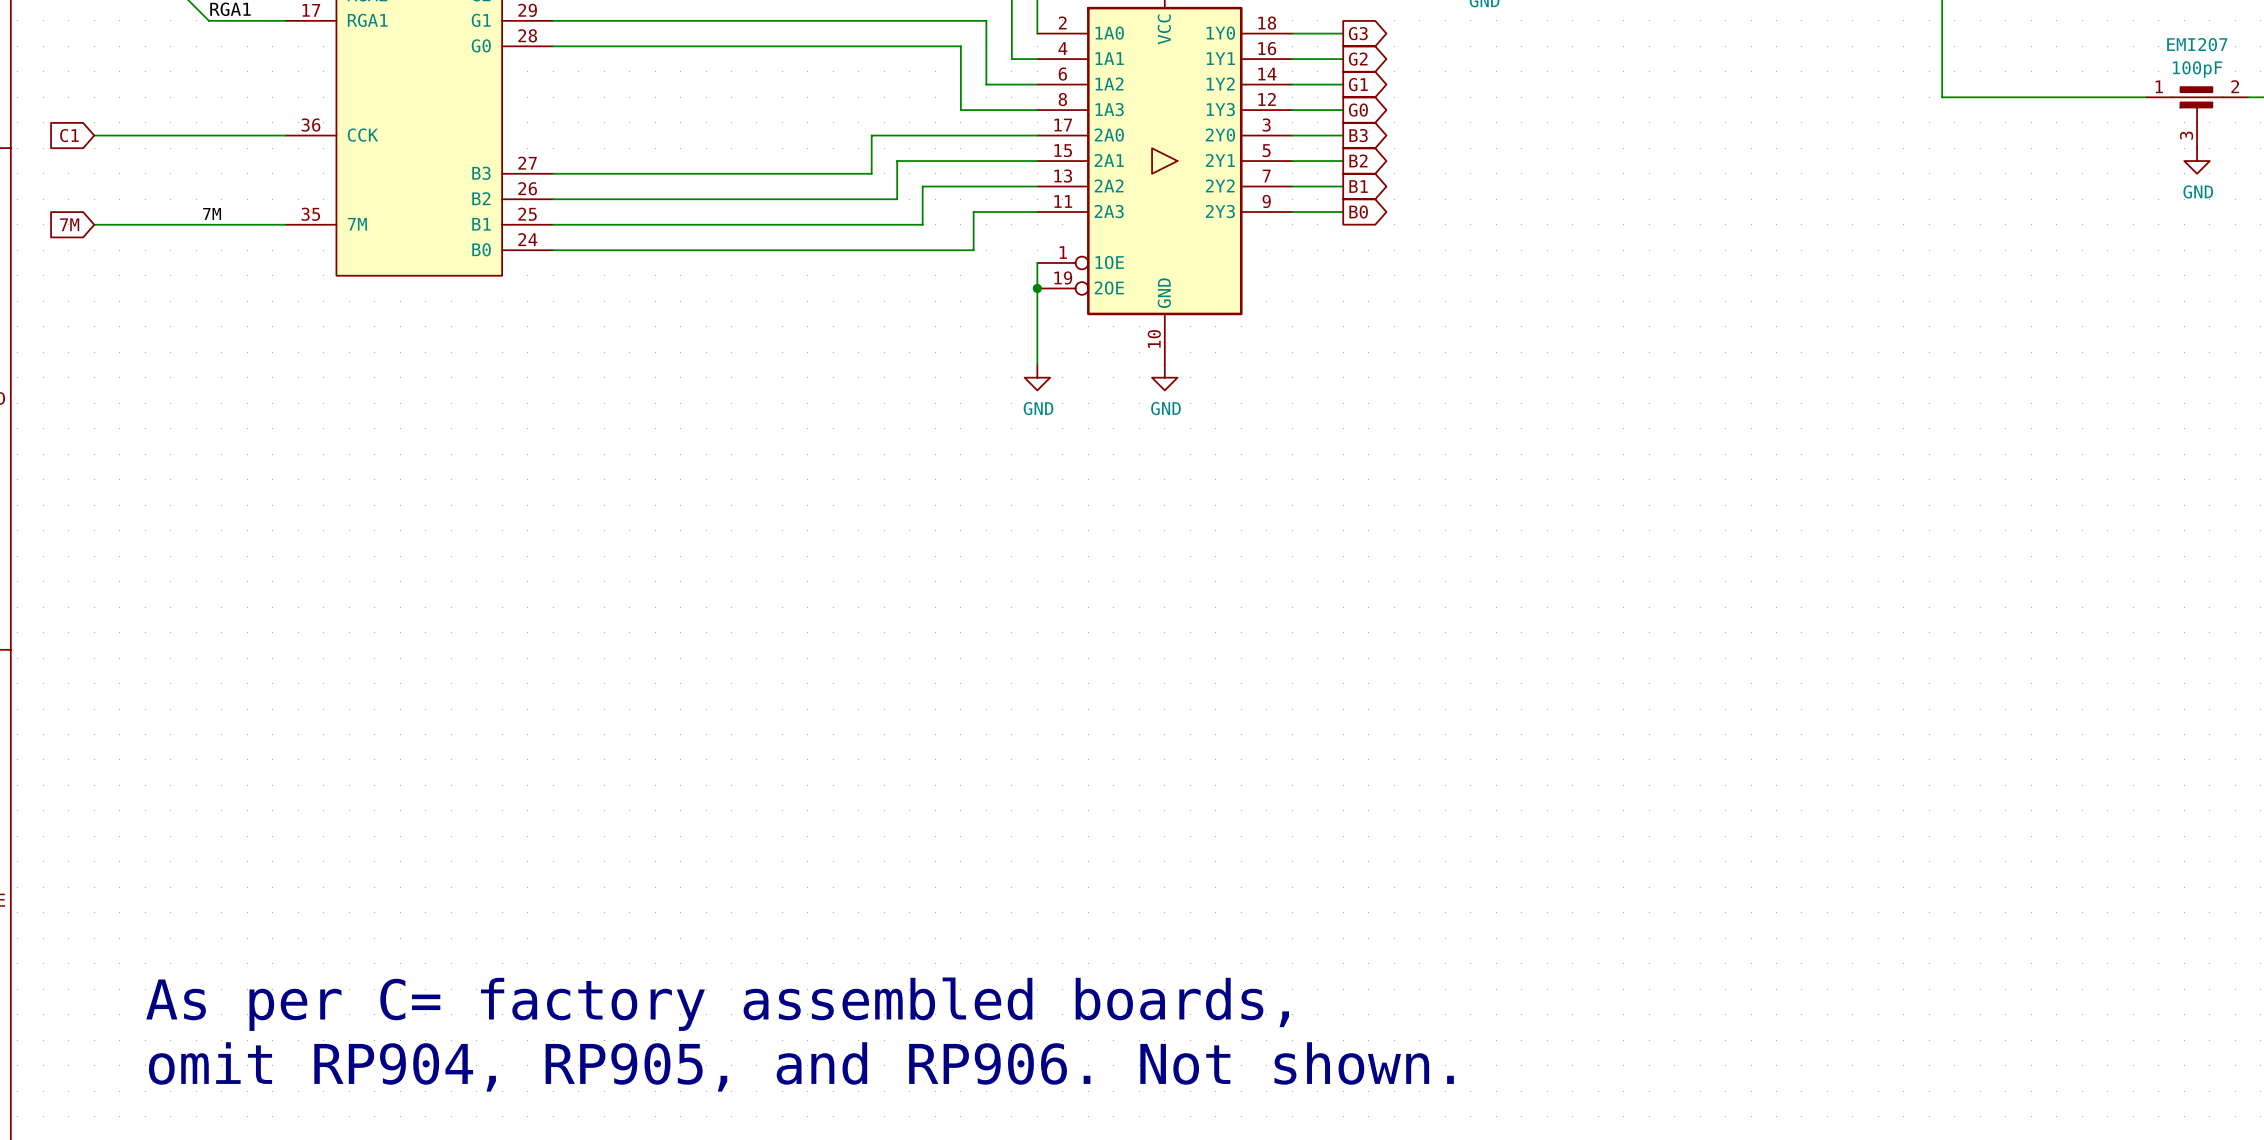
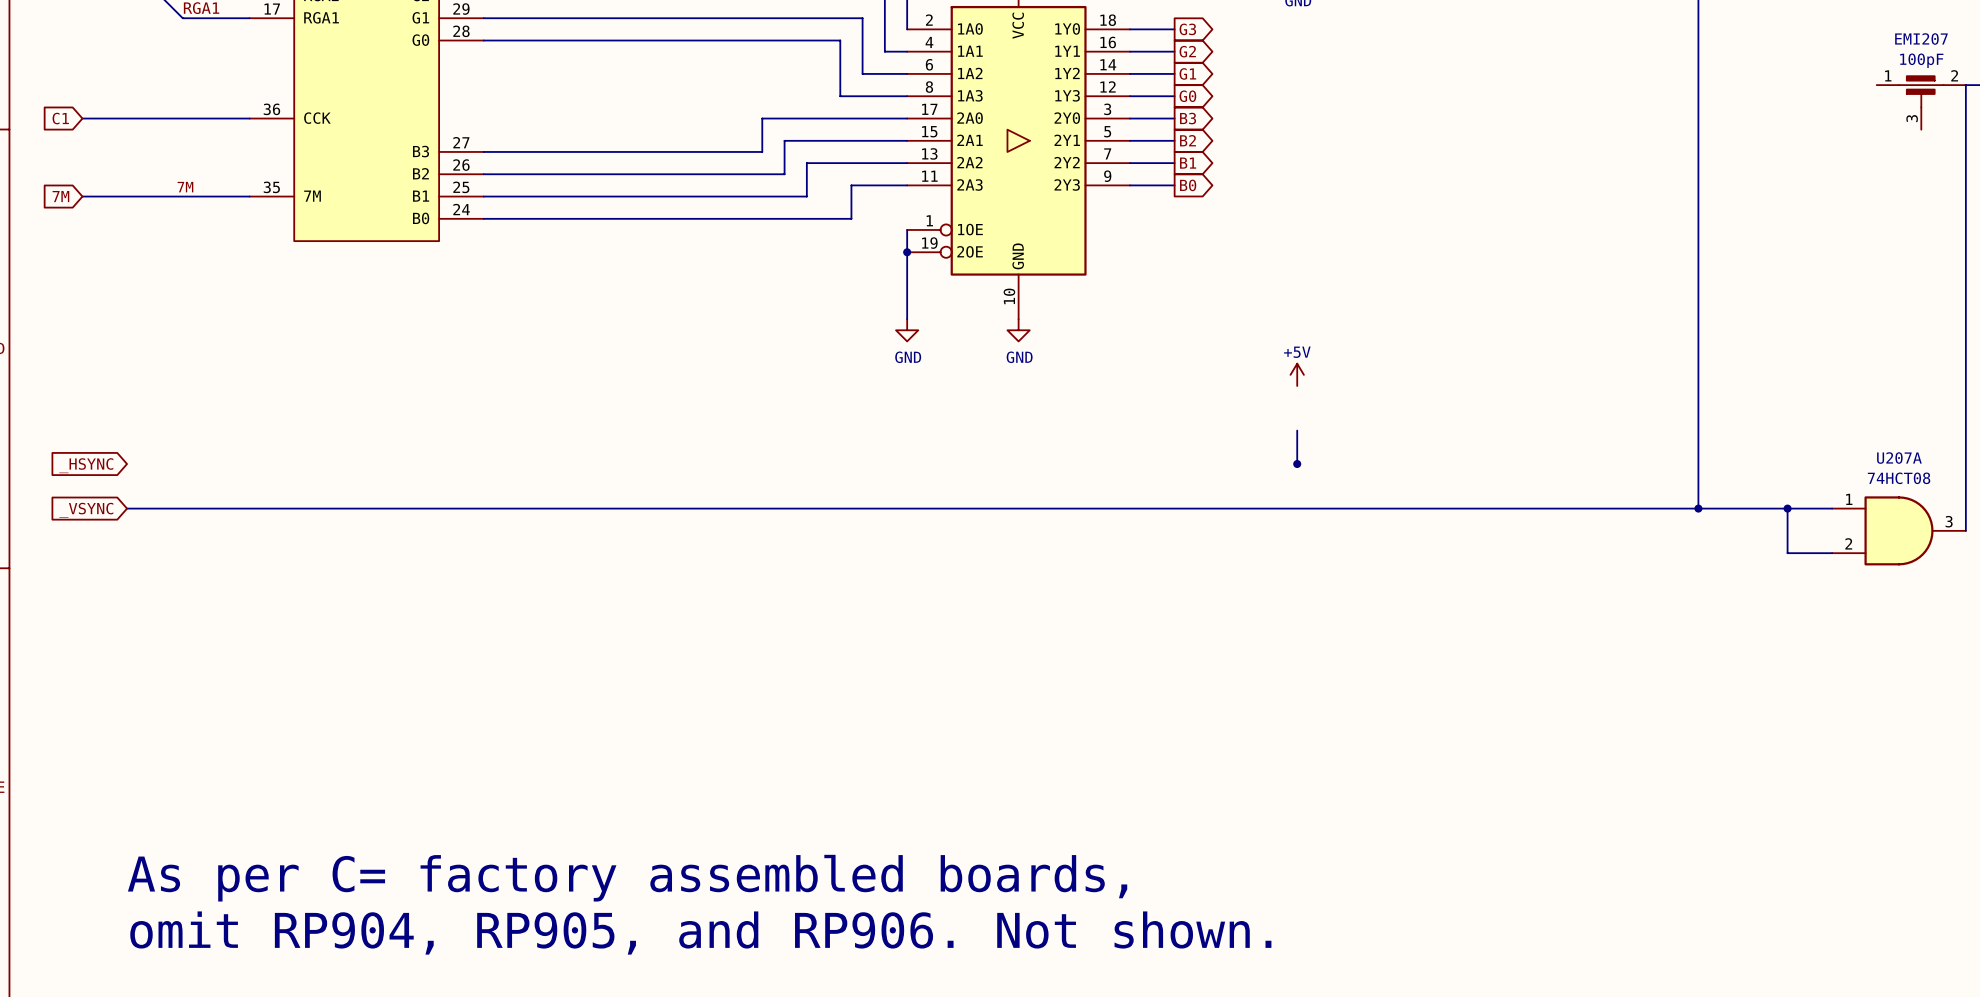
wire: (1942, 97) (2146, 97) -> (1698, 85) (1698, 508)
wire: none -> (1965, 85) (1965, 530)
power symbol: GND (2197, 161) -> none
power symbol: none -> +5V (1297, 374)
wire: none -> (1297, 430) (1297, 464)
junction: none -> (1297, 464)
global label: none -> _HSYNC (86, 465)
wire: none -> (127, 508) (1832, 508)
junction: none -> (1698, 508)
wire: none -> (1787, 508) (1787, 553) (1832, 553)
junction: none -> (1787, 508)
global label: none -> _VSYNC (86, 510)
U207A: none -> 74HCT08 (1899, 530)

